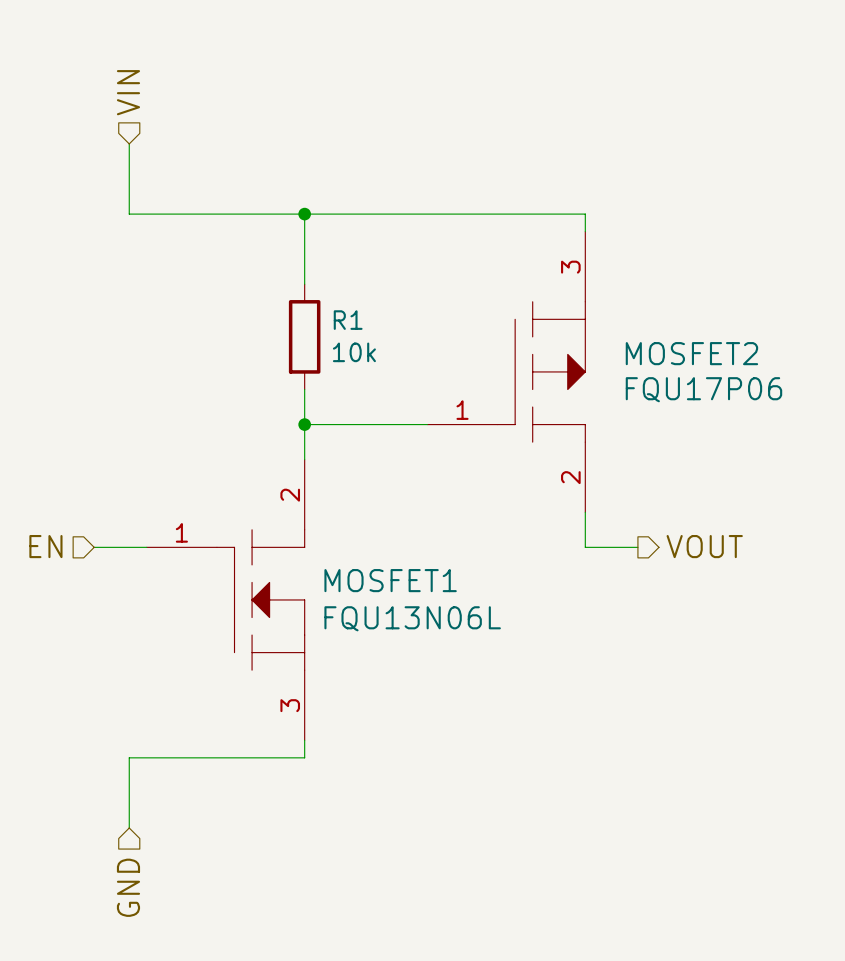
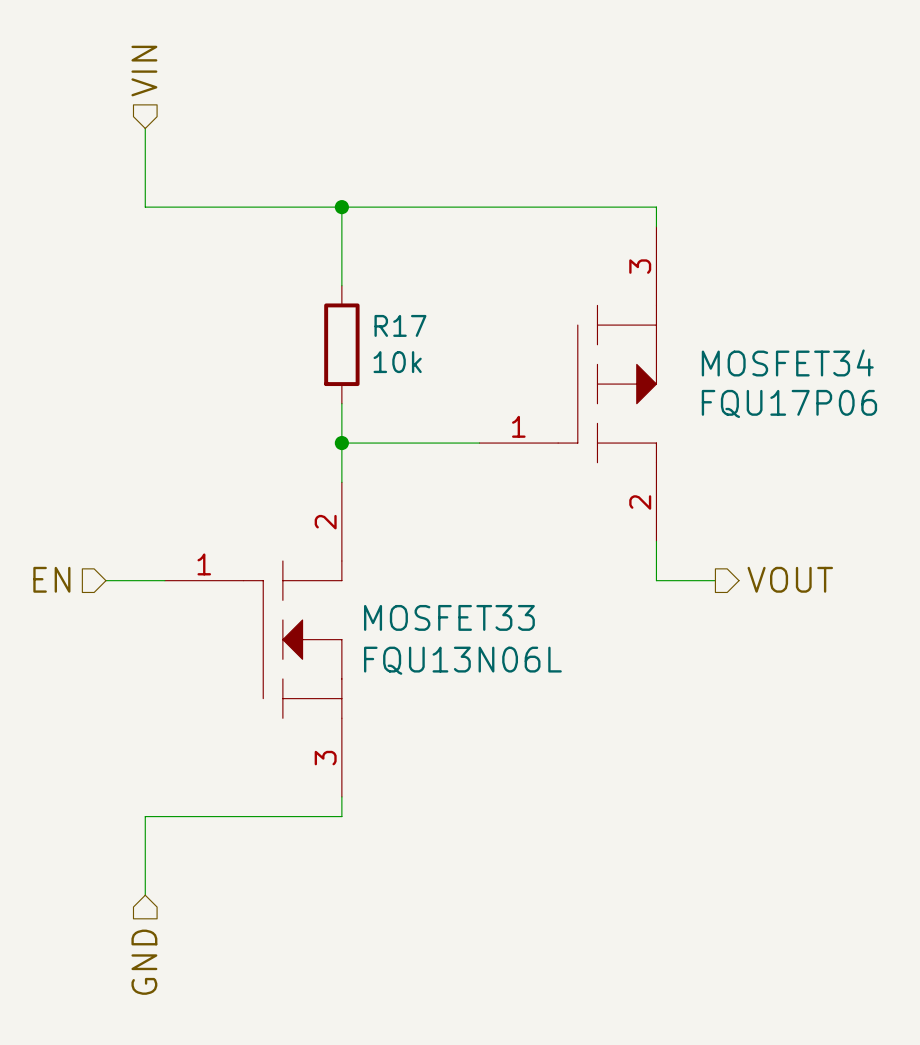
R1 name: R1 (348, 320) -> R17 (400, 325)
MOSFET2 name: MOSFET2 (691, 353) -> MOSFET34 (787, 362)
MOSFET1 name: MOSFET1 (390, 580) -> MOSFET33 (449, 617)

